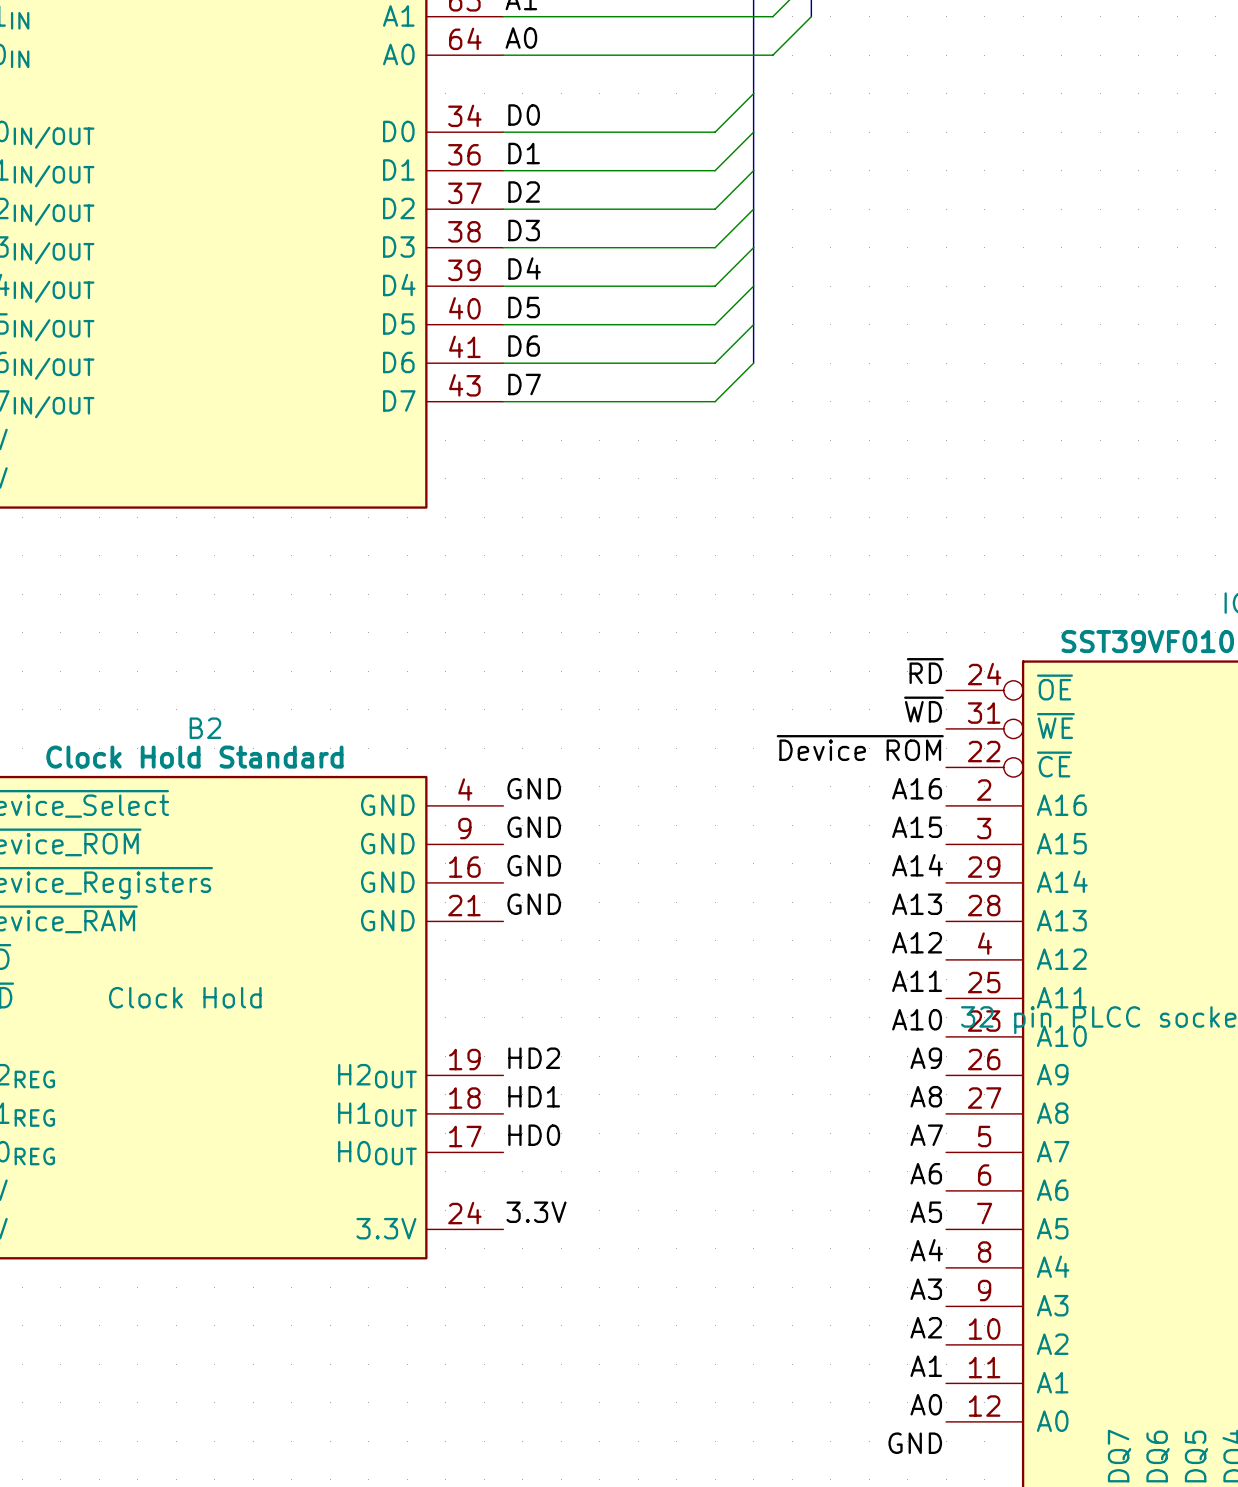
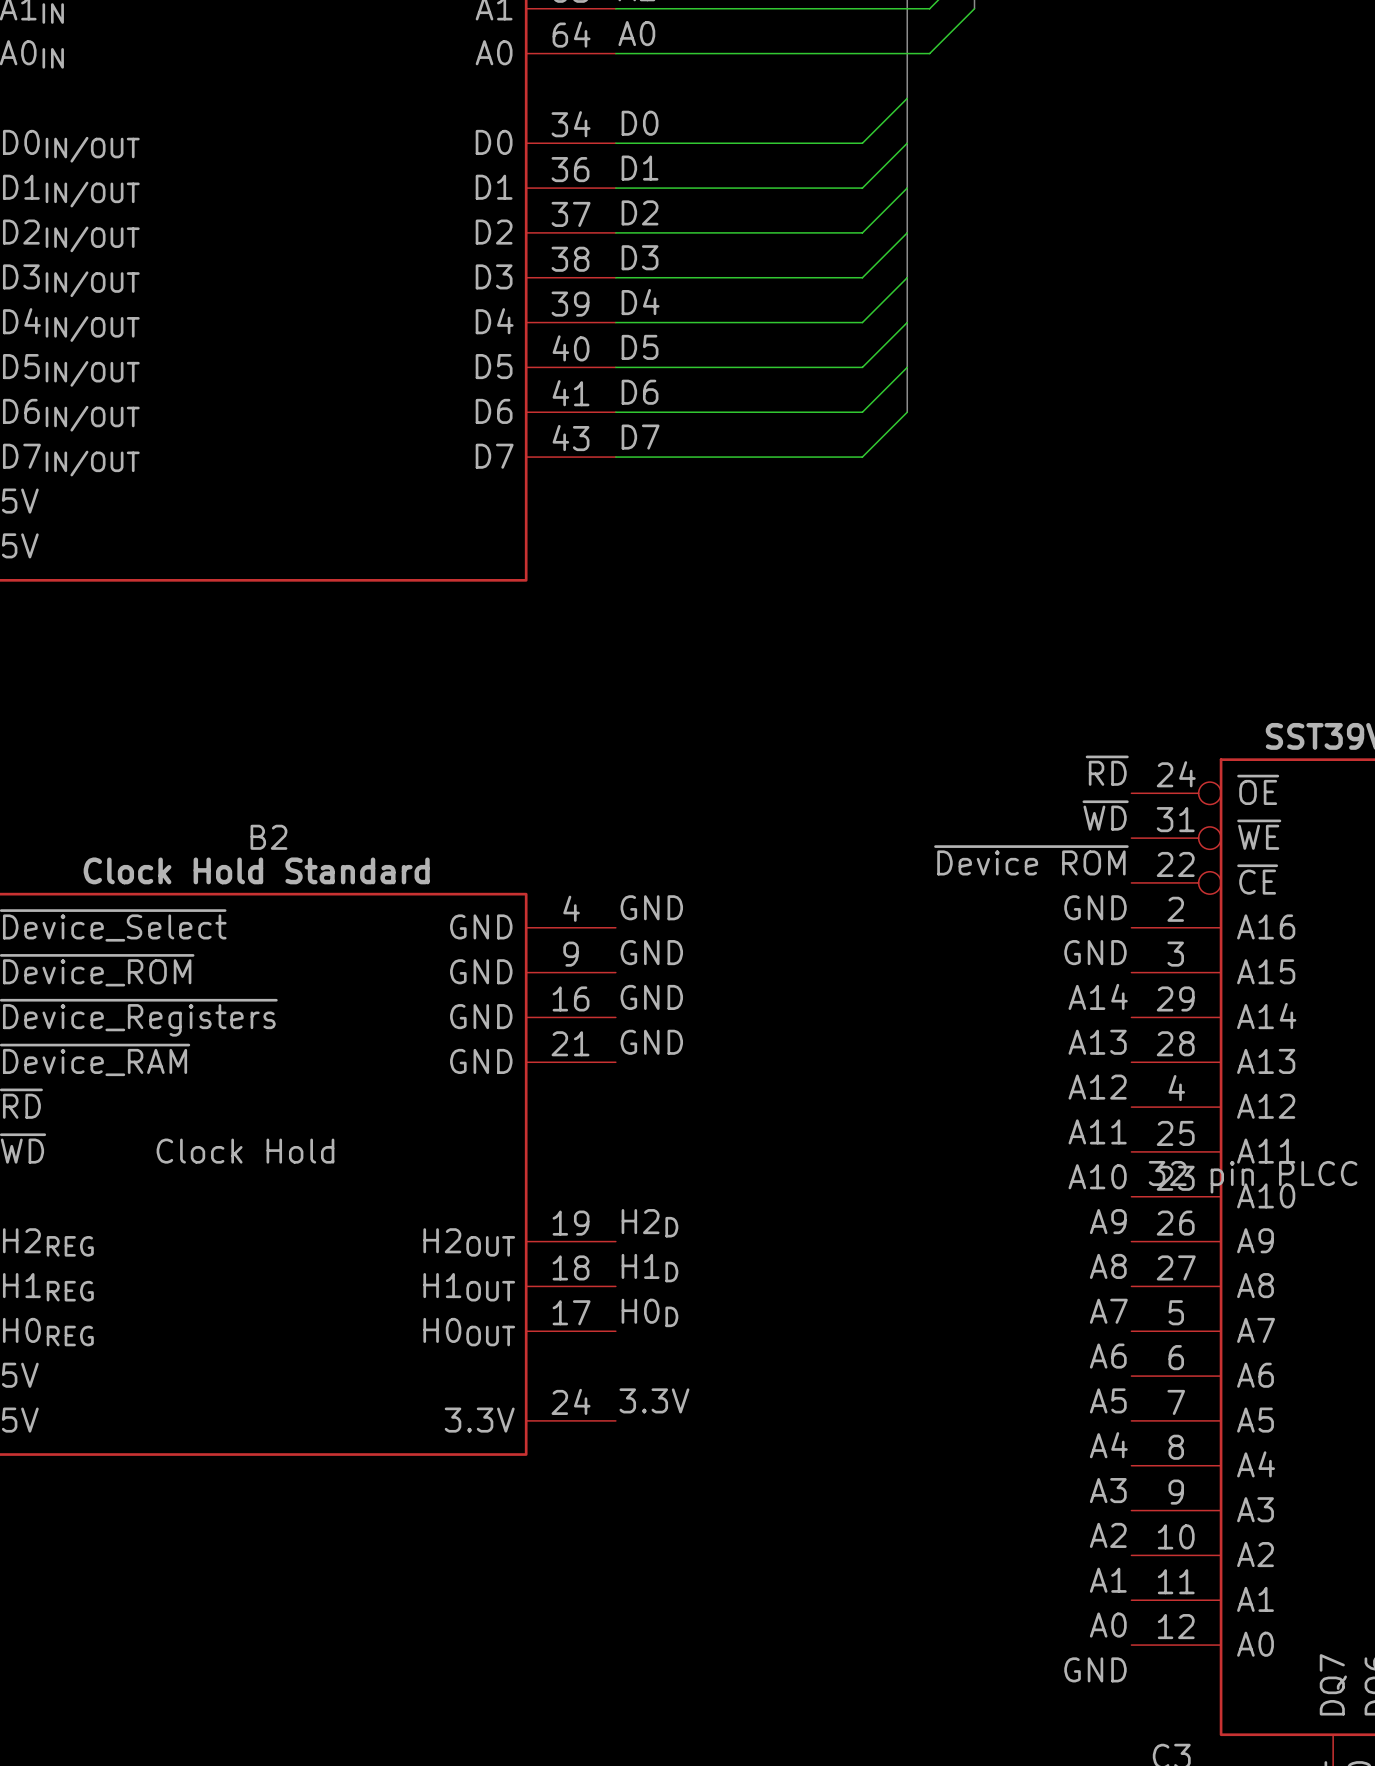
label: A16 (917, 788) -> GND (1095, 907)
label: A15 (917, 827) -> GND (1095, 952)
label: HD2 (534, 1058) -> H2D (649, 1223)
label: HD1 (534, 1096) -> H1D (649, 1268)
label: HD0 (534, 1135) -> H0D (649, 1312)

